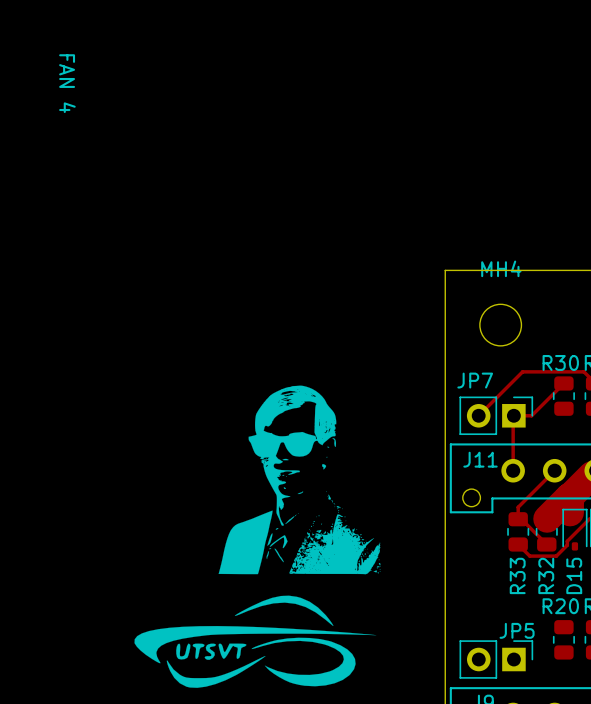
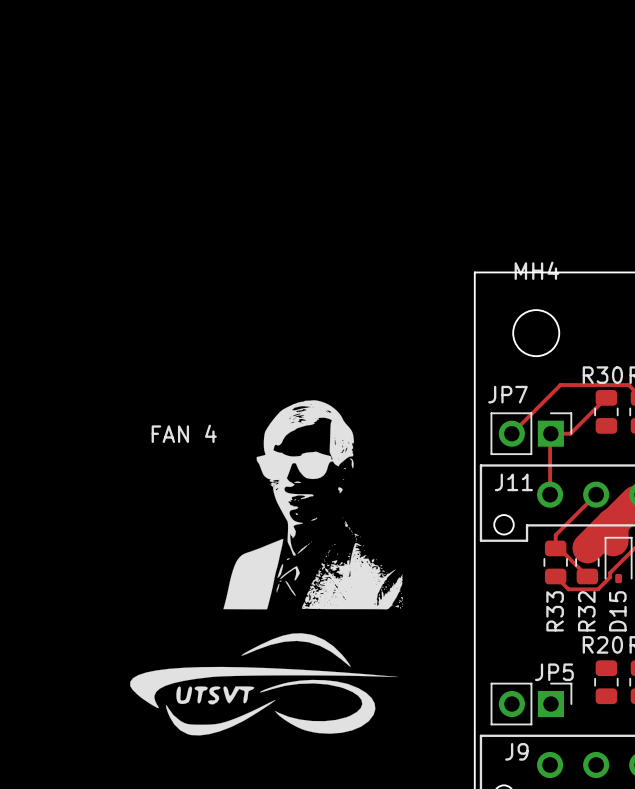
text: FAN 4 (67, 83) -> none
text: none -> FAN 4 (184, 433)

